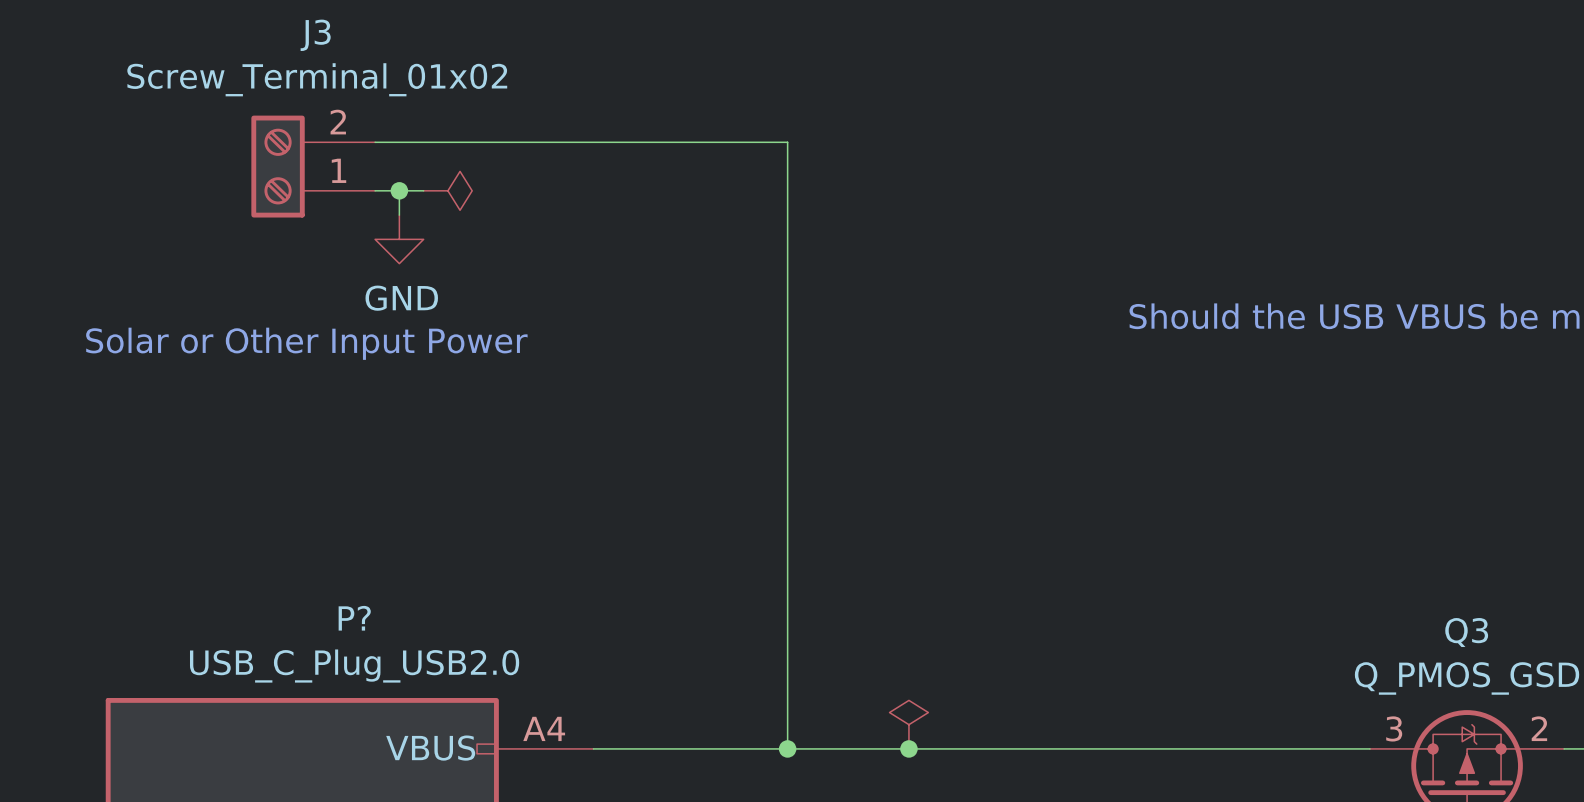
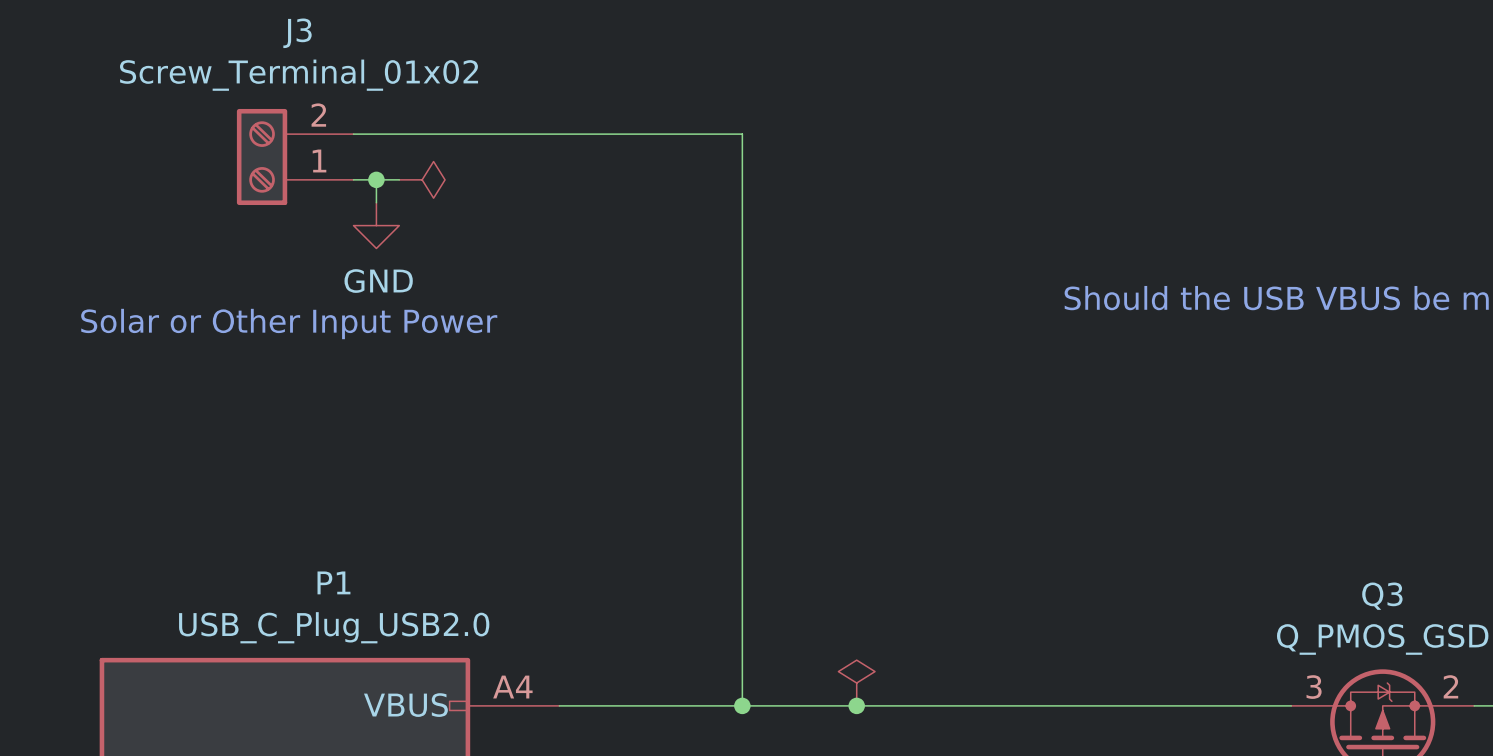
P? name: P? (354, 618) -> P1 (333, 582)

